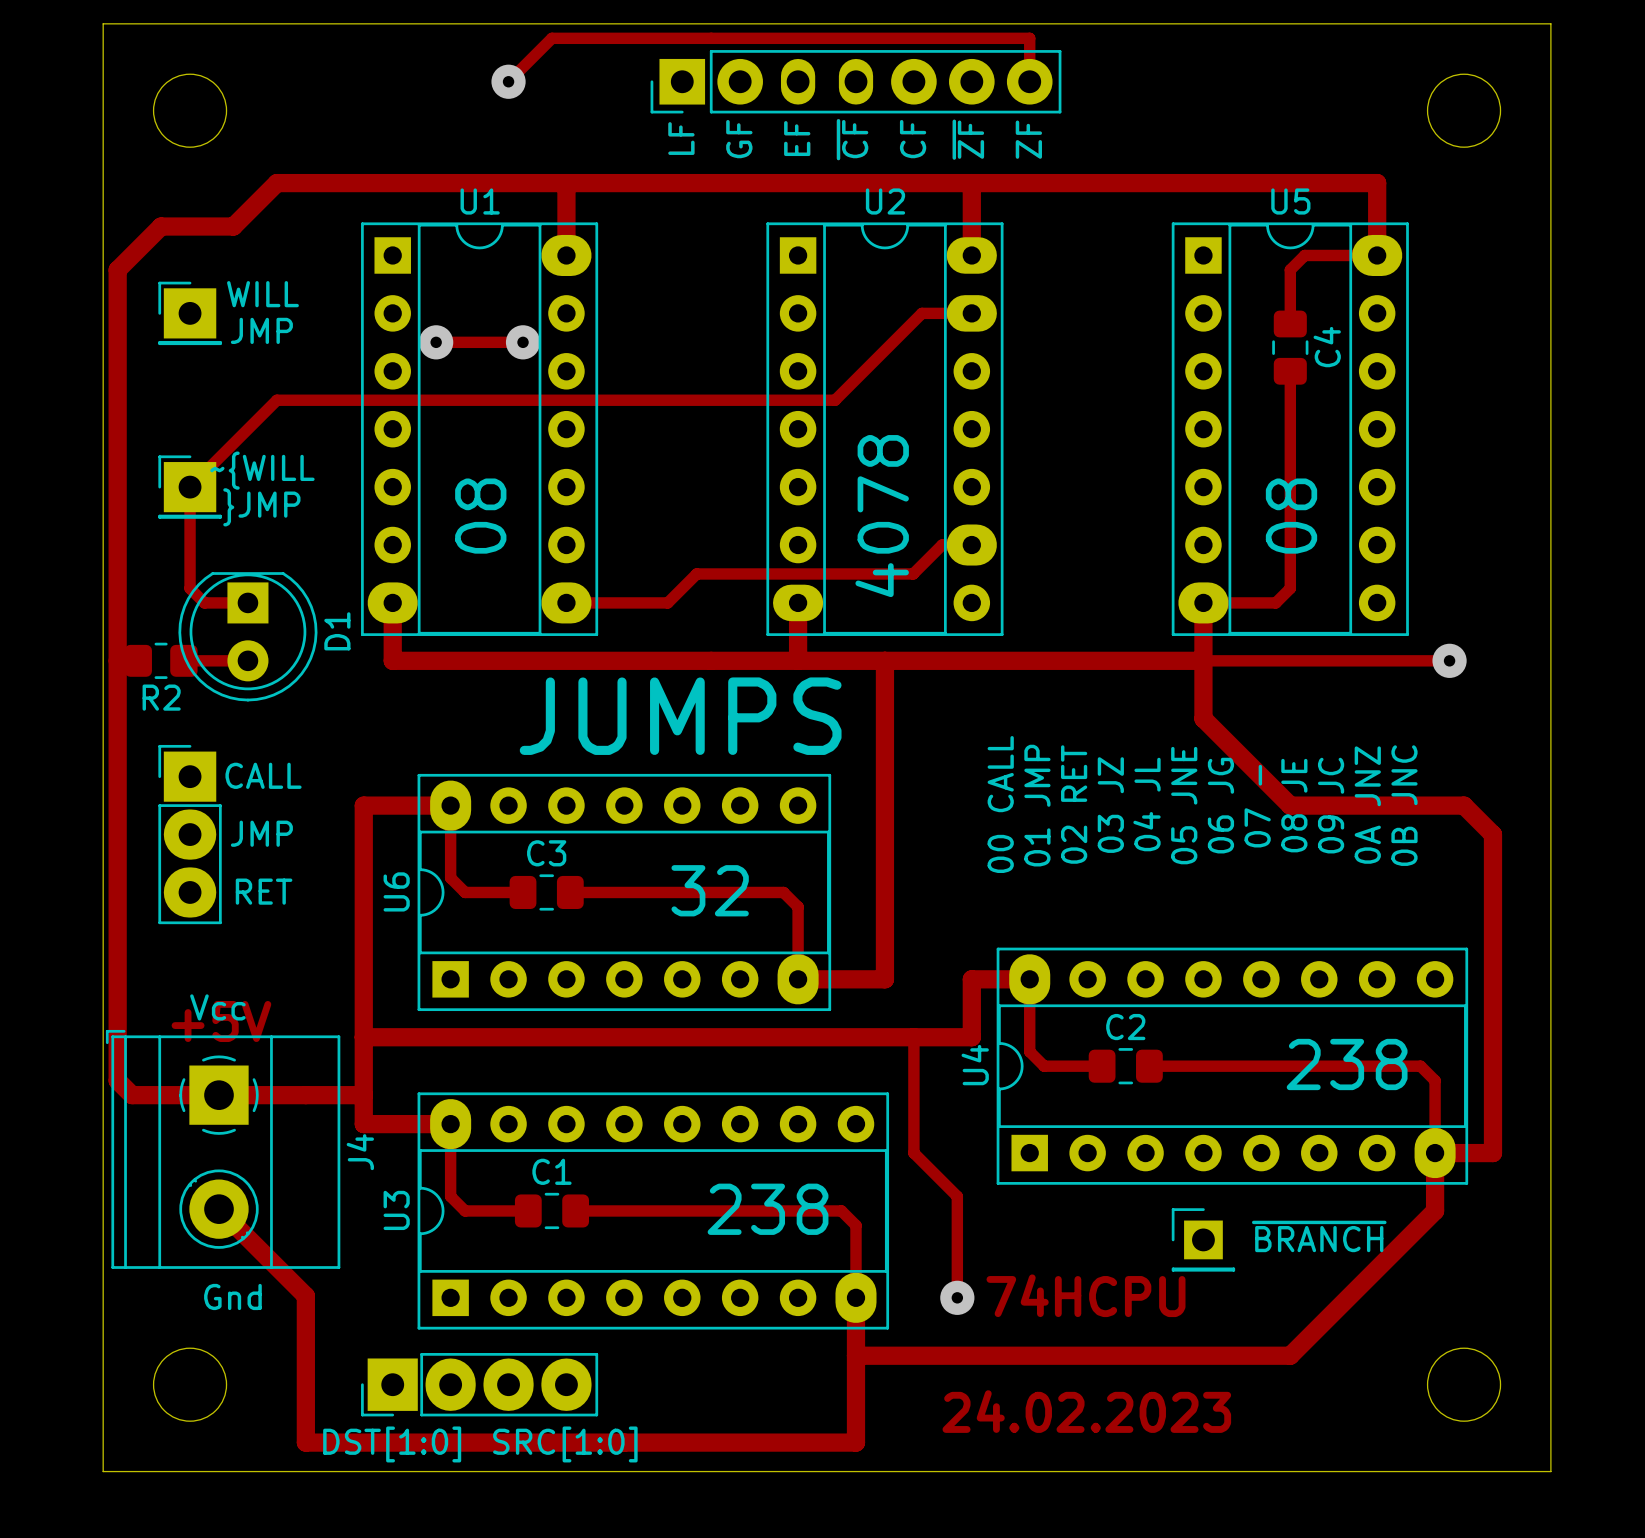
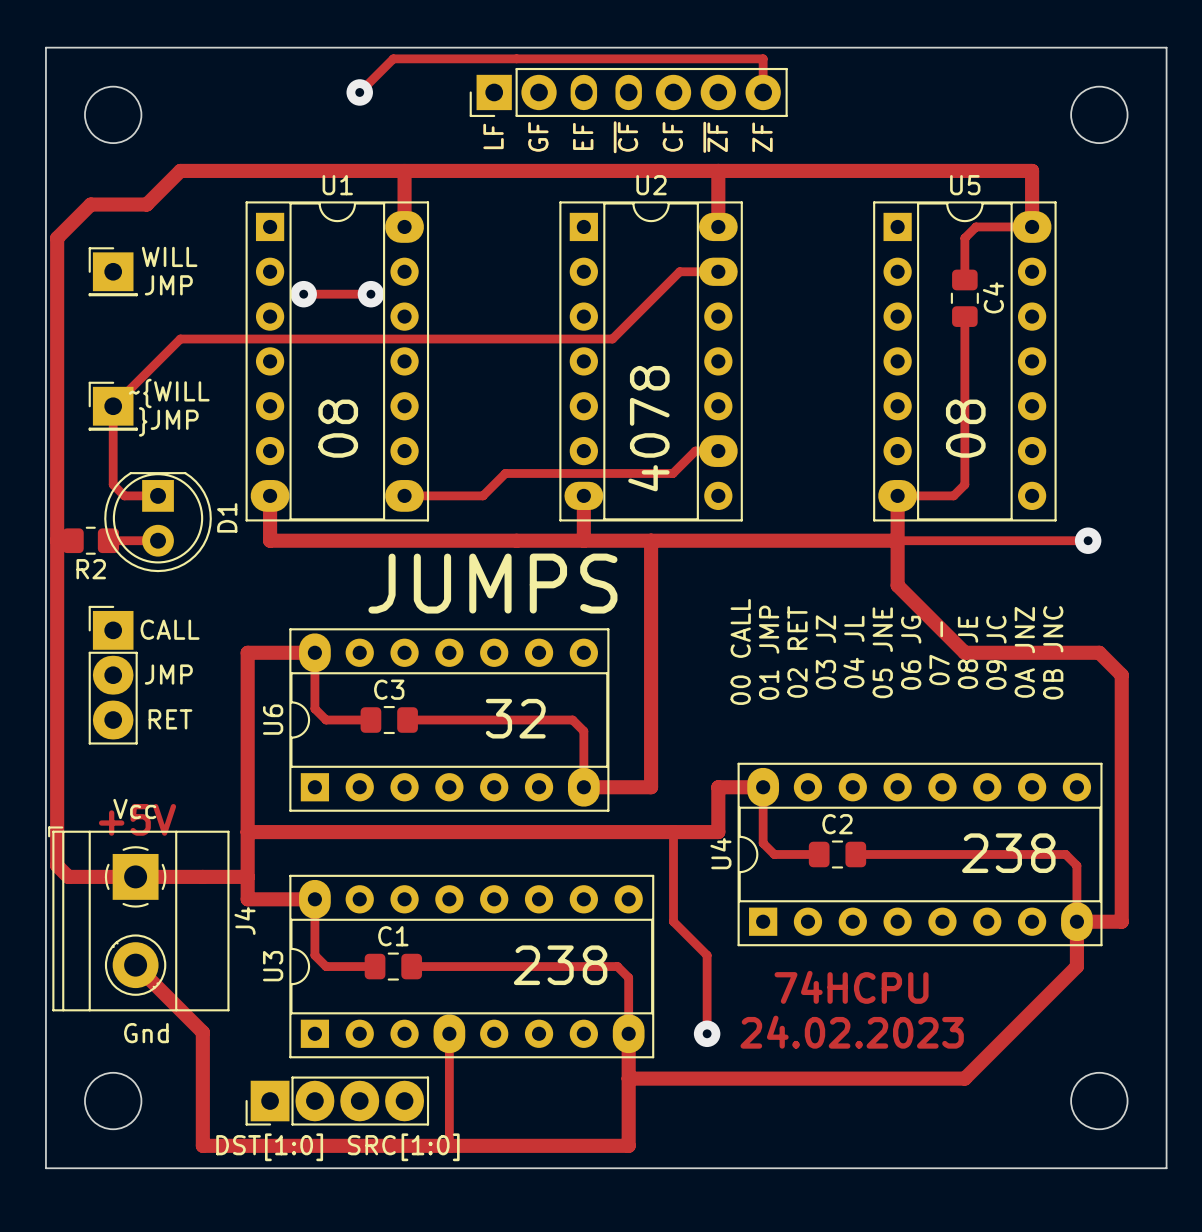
U3 footprint: [417, 1092, 890, 1330] -> [289, 874, 655, 1059]
text: ~{BRANCH} (1319, 1236) -> none
part: (1203, 1239) -> none
text position: 74HCPU (1086, 1295) -> 74HCPU (851, 987)
track: none -> (449, 1033) (449, 1145)
text position: 24.02.2023 (1086, 1411) -> 24.02.2023 (852, 1032)

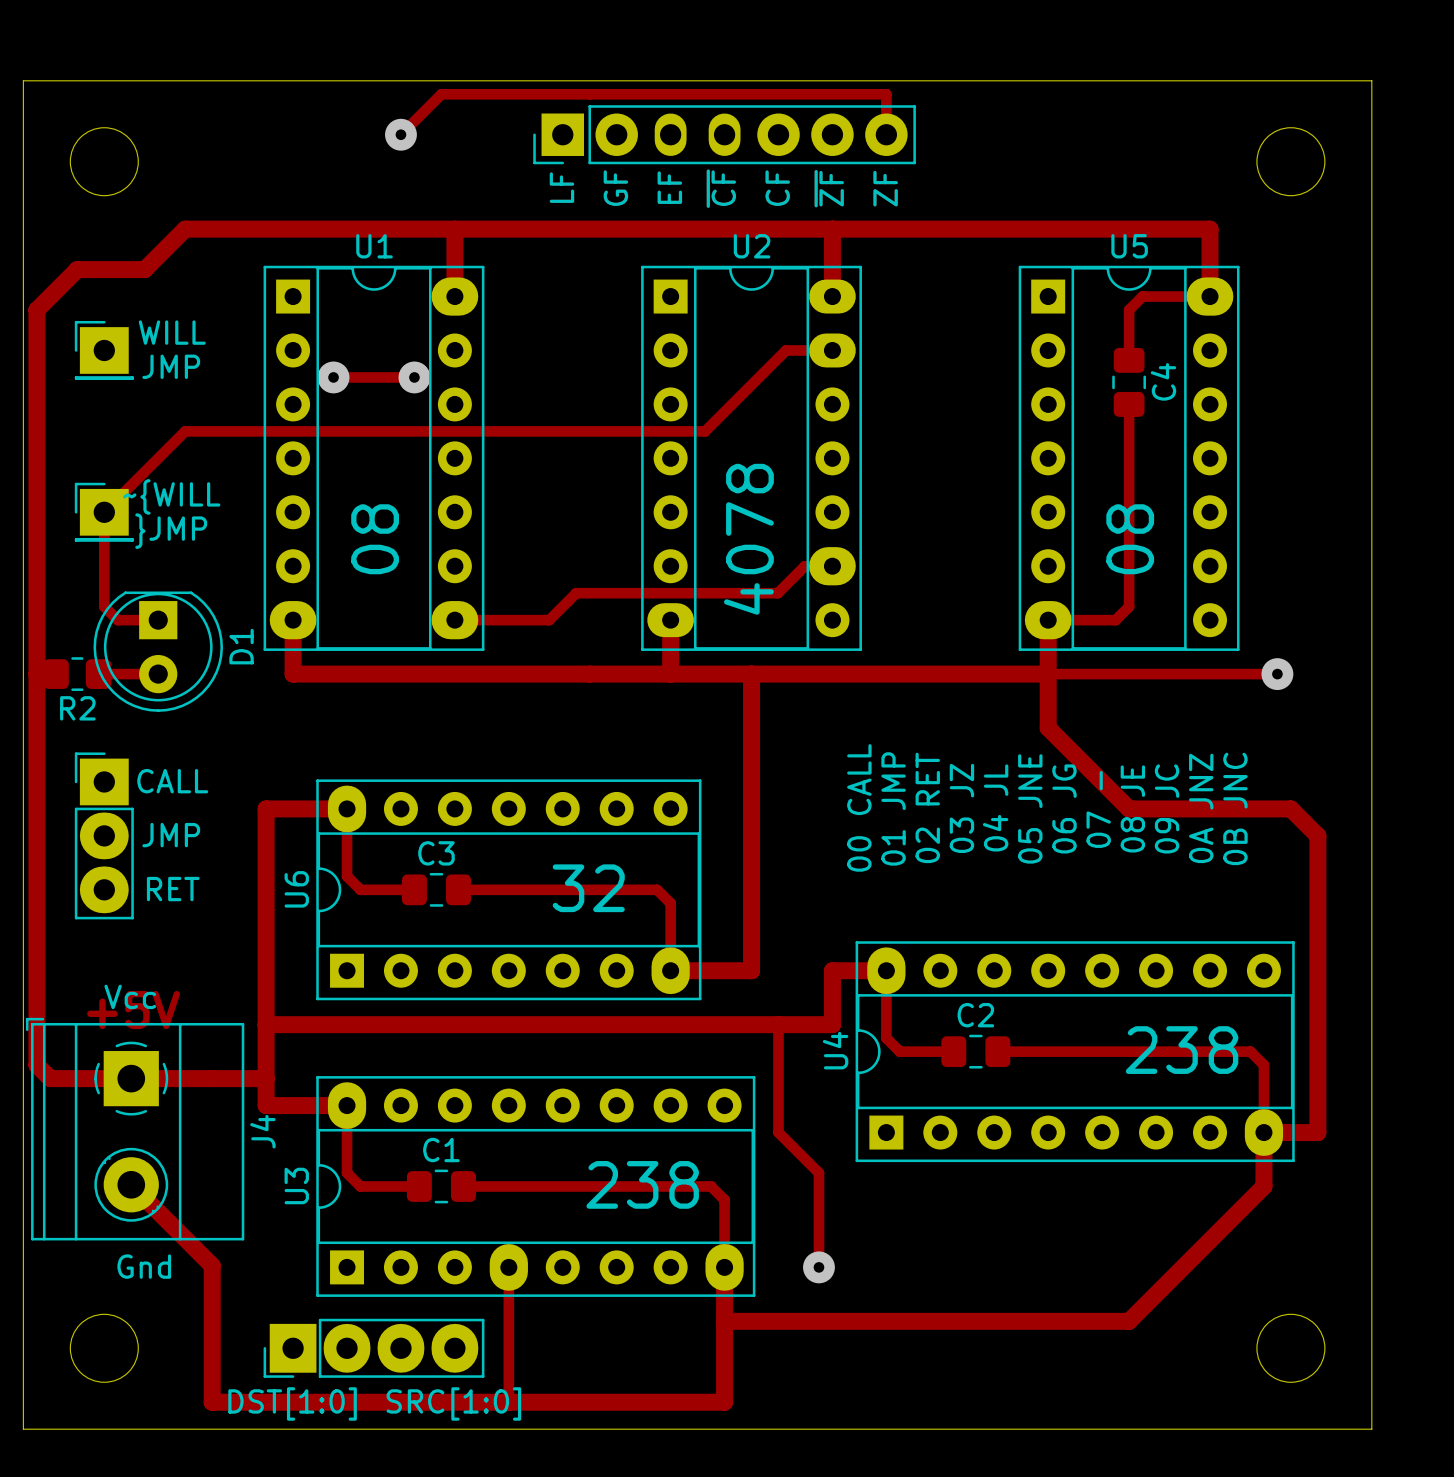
text: JUMPS (492, 583) -> none
text: 74HCPU (851, 987) -> none
text: 24.02.2023 (852, 1032) -> none

